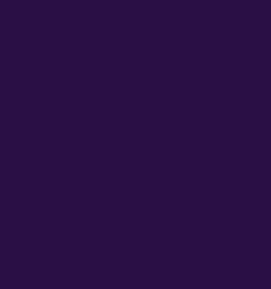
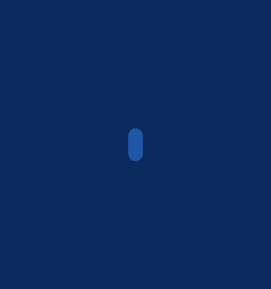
track: none -> (135, 135) (135, 153)

